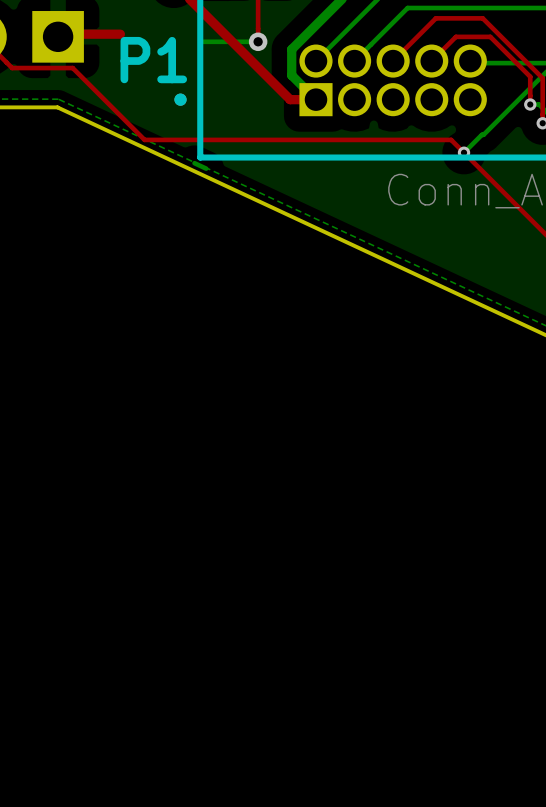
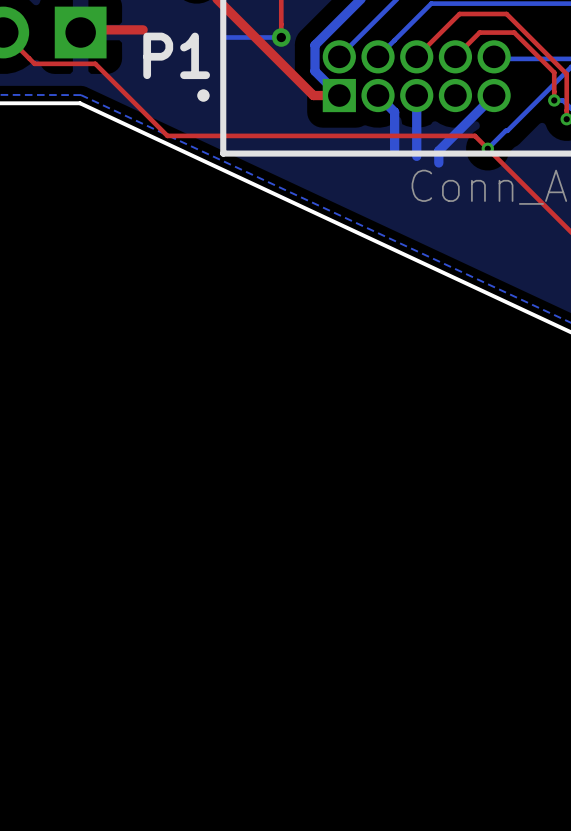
bottom track: none -> (378, 95) (394, 112) (394, 149)
bottom track: none -> (416, 95) (416, 156)
bottom track: none -> (494, 95) (438, 150) (438, 162)
bottom track: (194, 163) (206, 168) -> none

